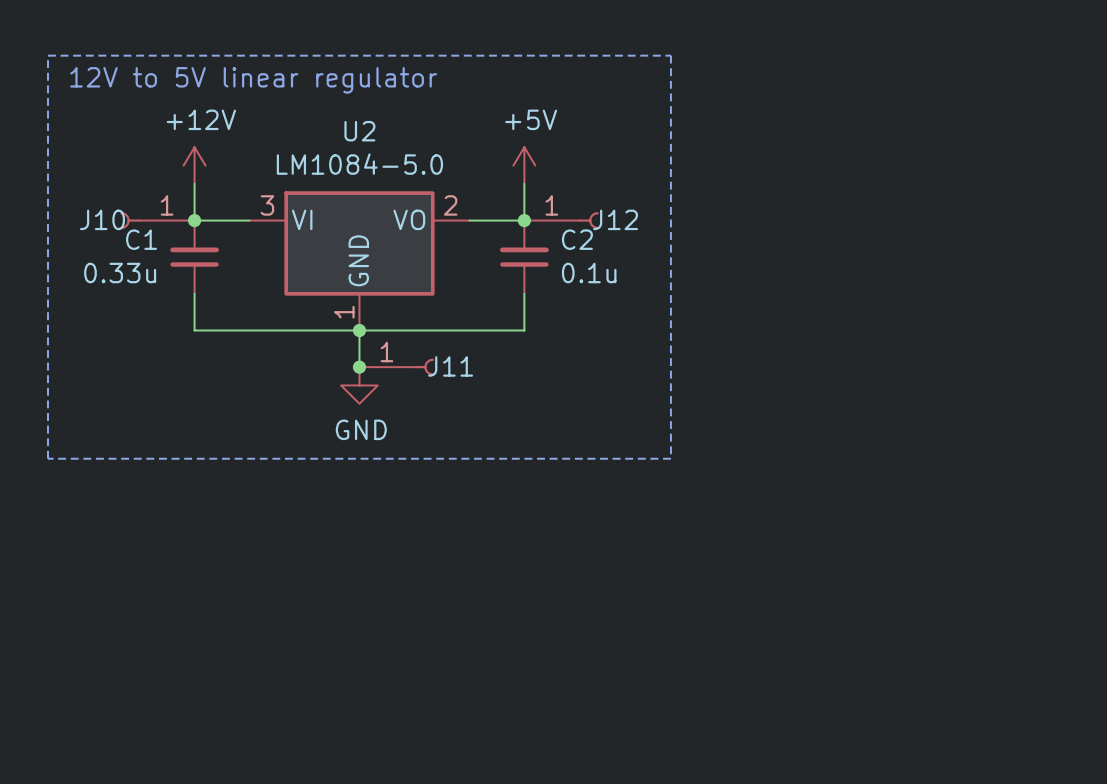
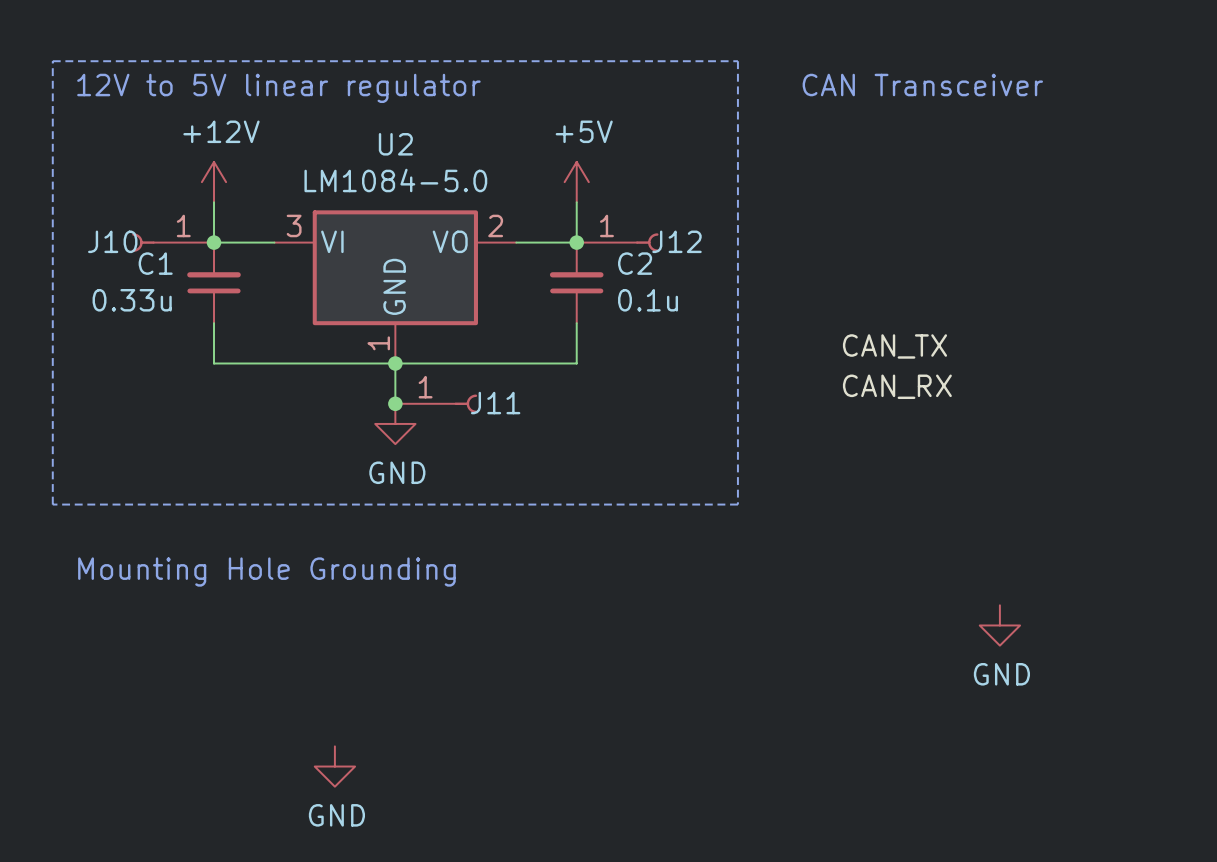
text: none -> CAN Transceiver (922, 85)
label: none -> CAN_TX (894, 346)
label: none -> CAN_RX (897, 386)
text: none -> Mounting Hole Grounding (266, 572)
power symbol: none -> GND (999, 625)
power symbol: none -> GND (334, 766)

